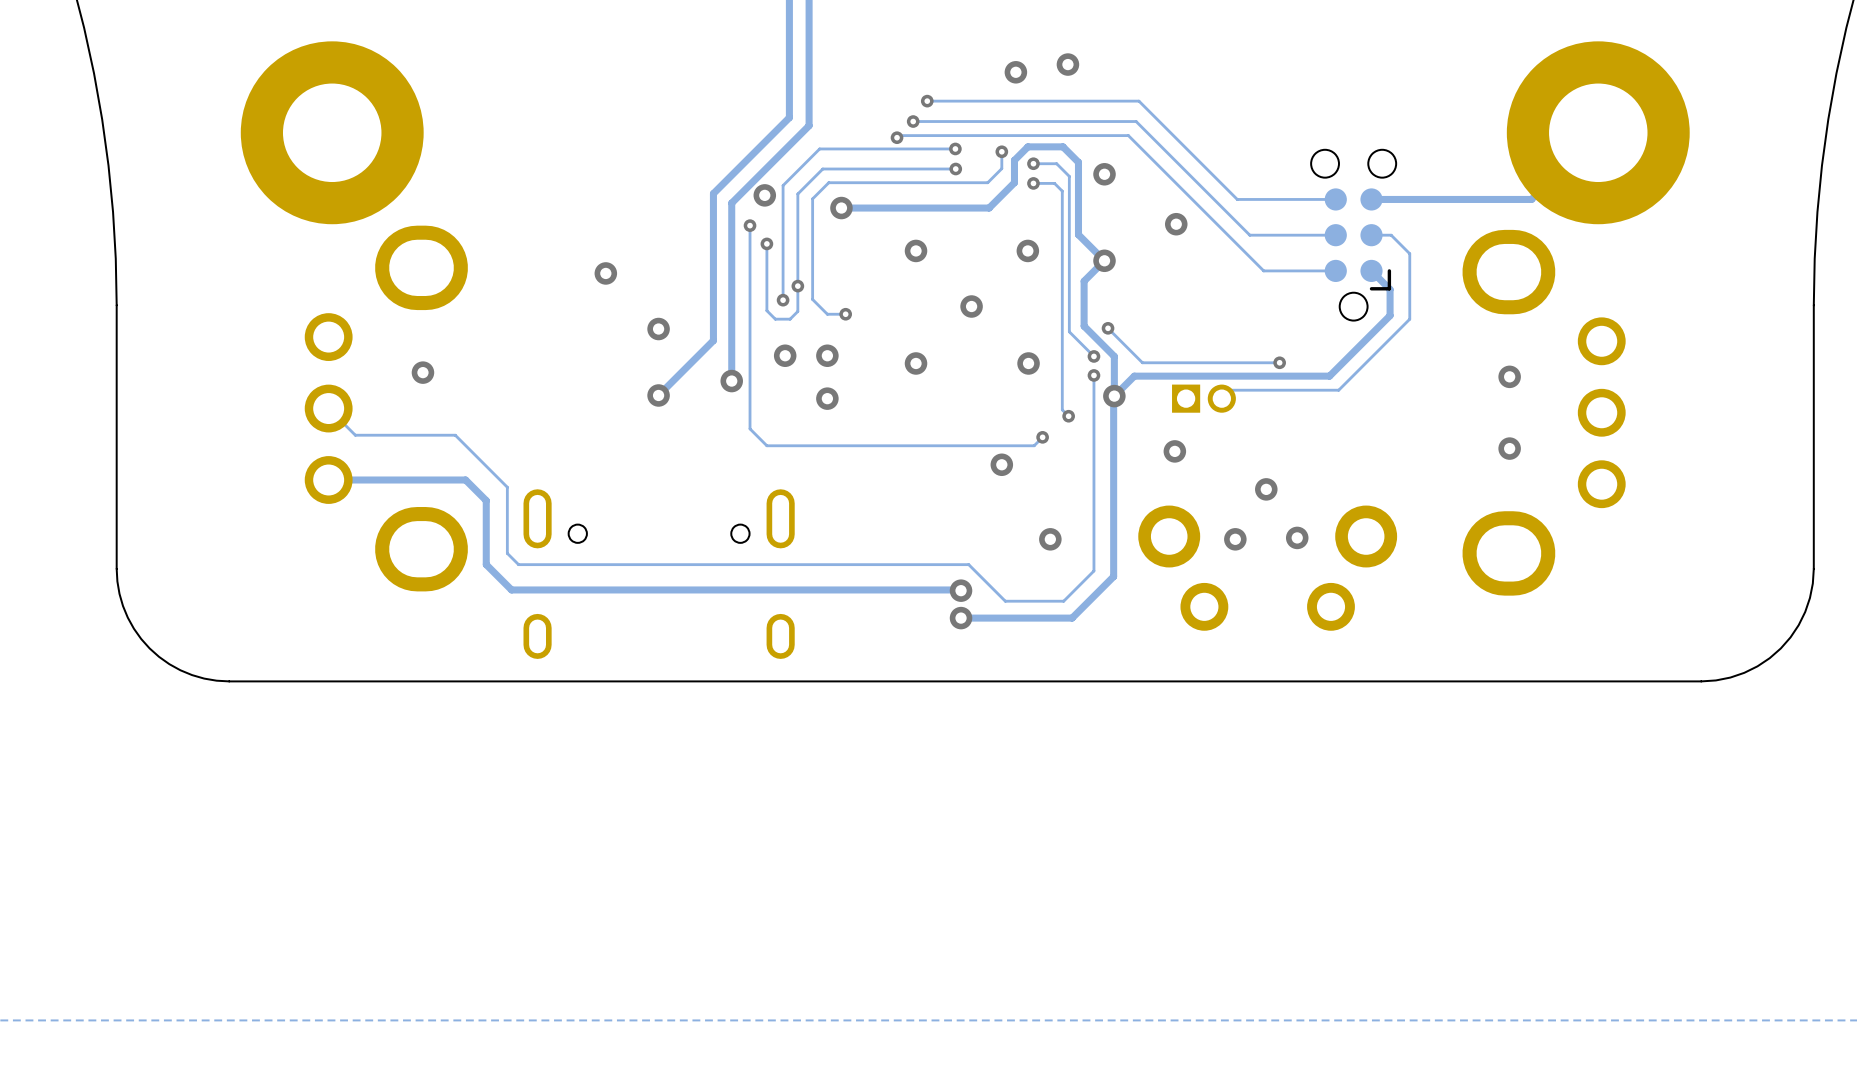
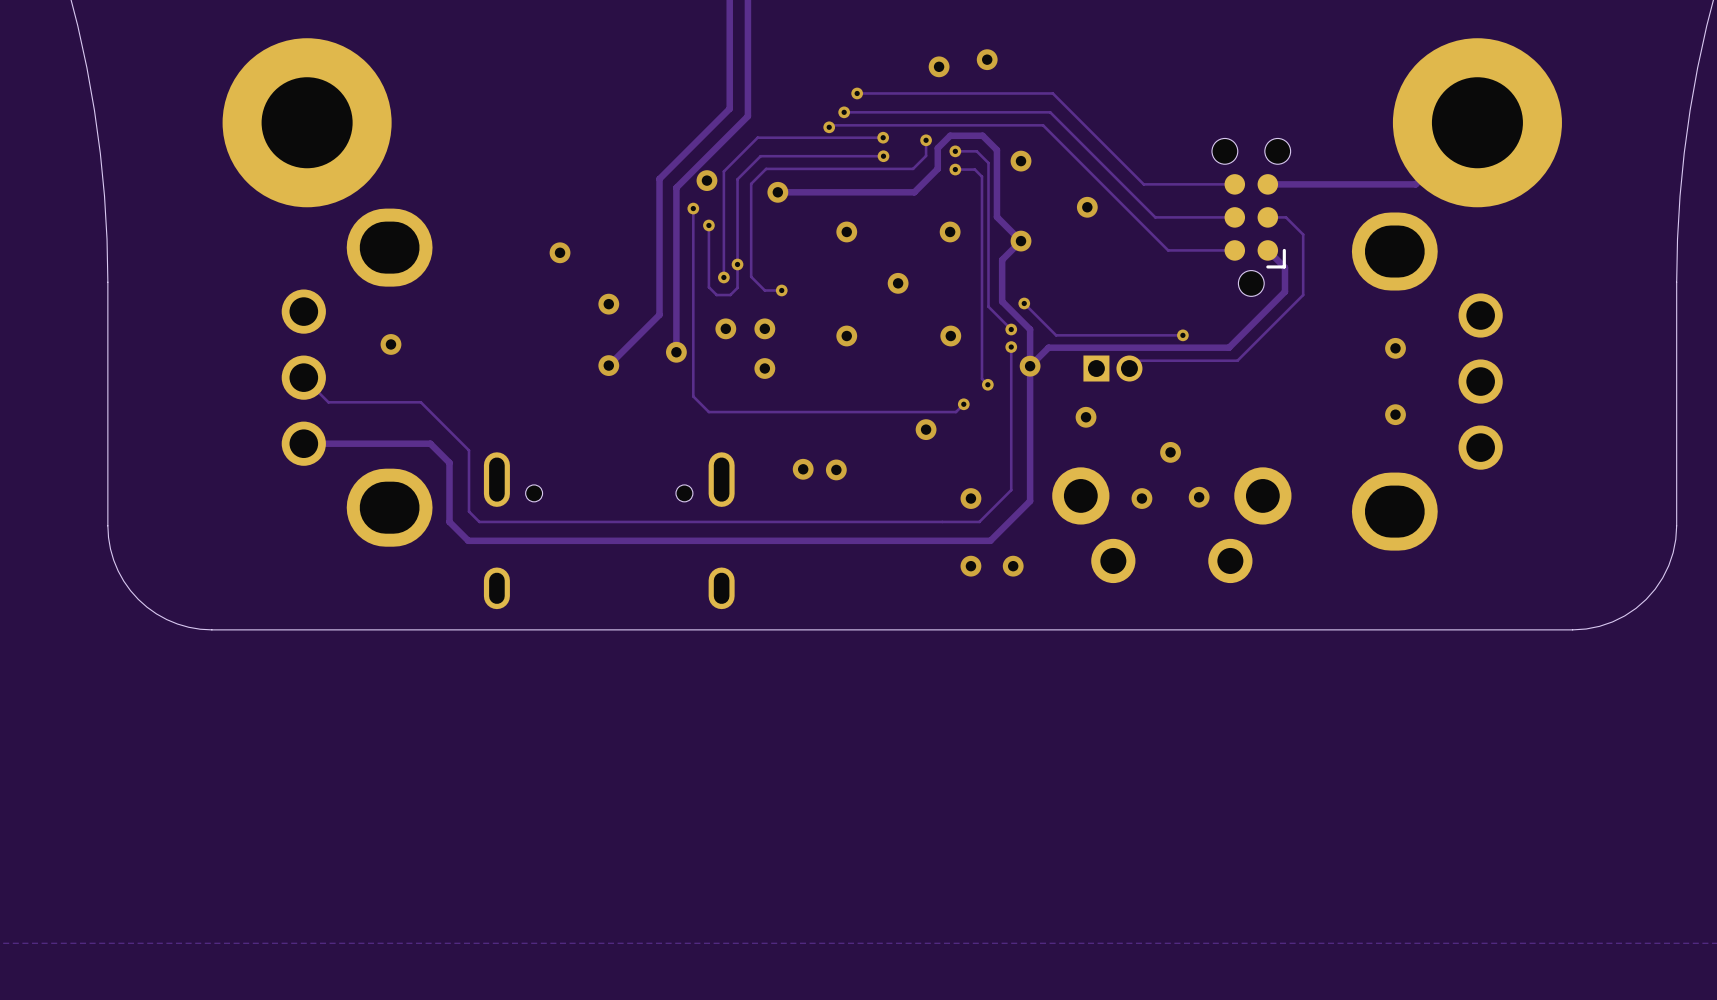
track: (1114, 396) (1113, 576) (1072, 618) (961, 618) -> none
via: none -> (803, 469)
via: none -> (836, 469)
track: (1093, 530) (1093, 570) (1063, 601) (1005, 601) (968, 564) -> (1011, 490) (979, 521) (895, 521)
track: (506, 585) (511, 589) (961, 590) -> (468, 540) (990, 540) (1030, 501) (1030, 366)
via: (961, 590) -> none
via: none -> (970, 566)
via: none -> (1013, 566)
via: (961, 618) -> none

